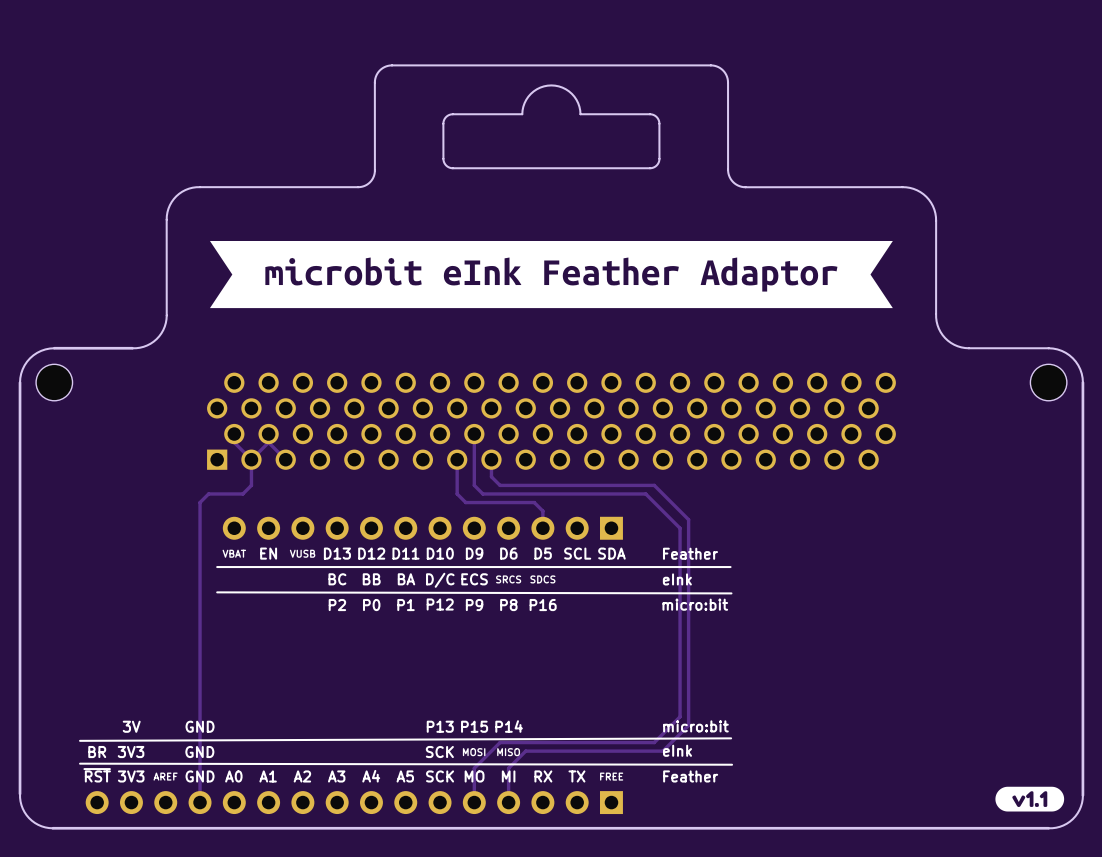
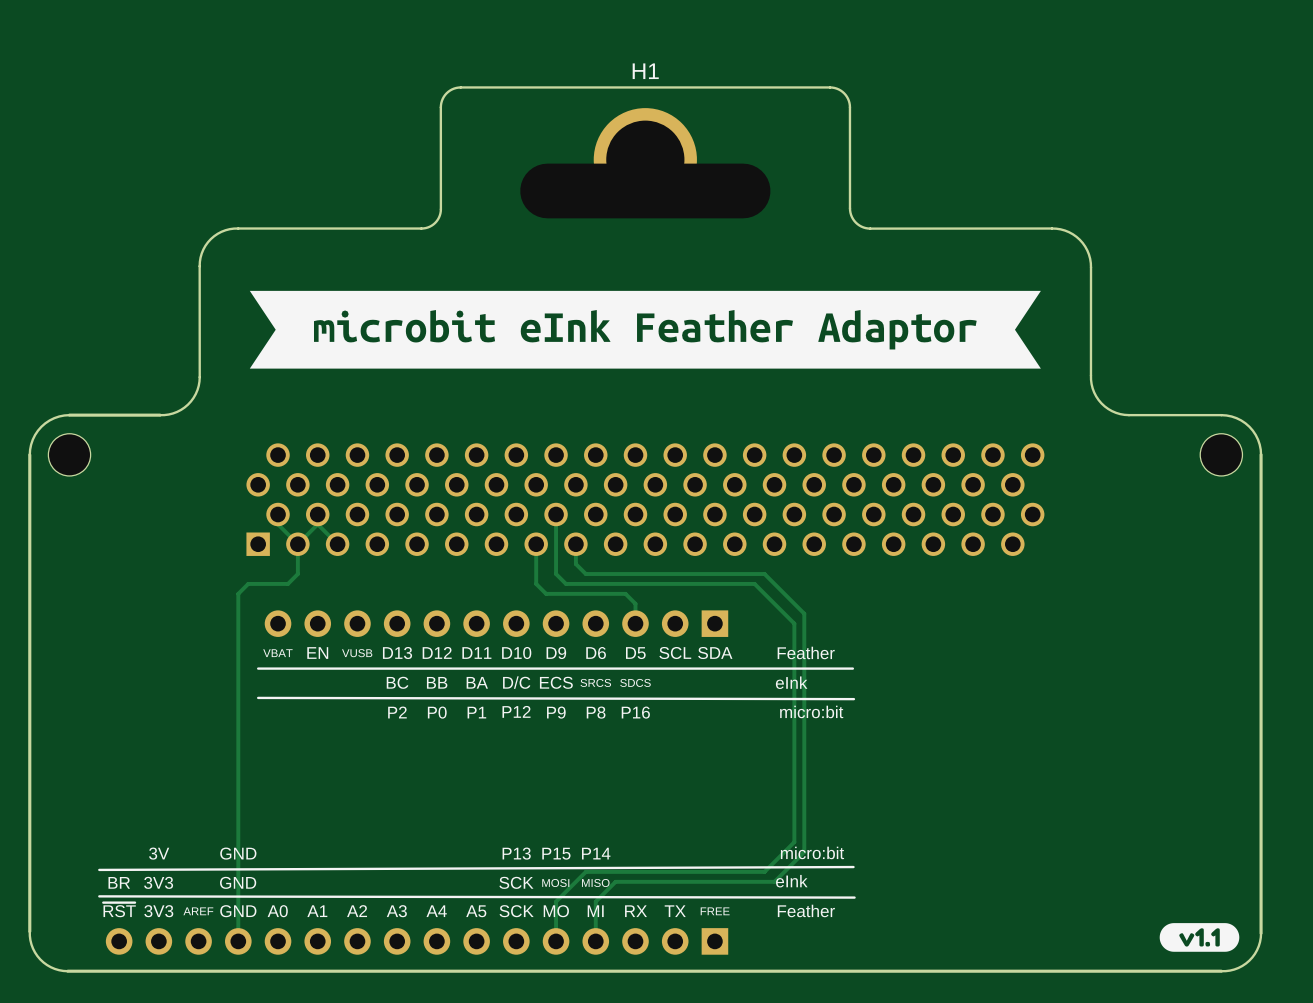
board edge: (452, 114) (522, 114) (524, 103) (533, 91) (543, 86) (558, 86) (574, 96) (580, 114) (649, 114) (655, 116) (659, 122) (659, 160) (655, 166) (650, 168) (450, 168) (446, 165) (443, 159) (443, 123) (446, 117) (452, 114) -> none
H1: none -> (645, 163)

